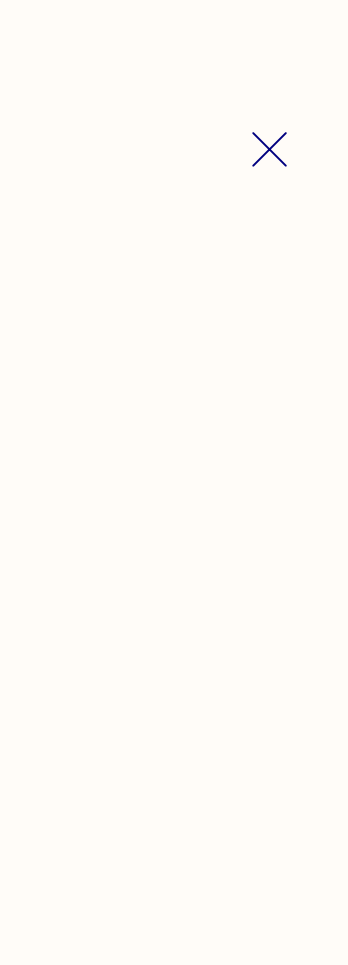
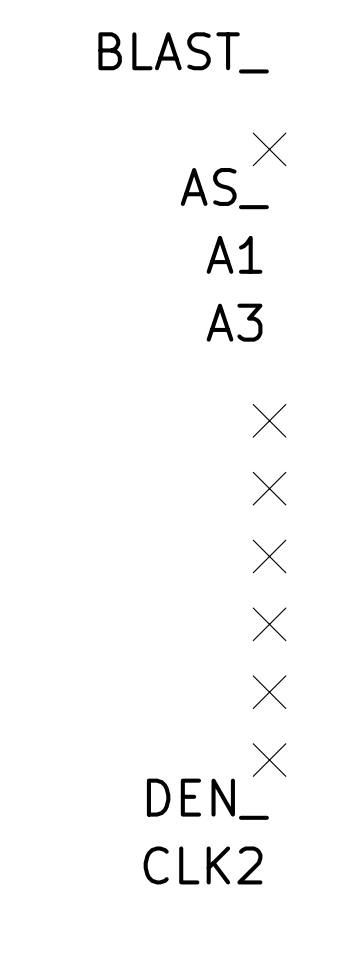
label: none -> BLAST_ (183, 52)
label: none -> AS_ (224, 188)
label: none -> A1 (234, 254)
label: none -> A3 (234, 322)
no-connect mark: none -> (269, 420)
no-connect mark: none -> (269, 488)
no-connect mark: none -> (269, 556)
no-connect mark: none -> (269, 624)
no-connect mark: none -> (269, 692)
no-connect mark: none -> (269, 760)
label: none -> DEN_ (207, 799)
label: none -> CLK2 (203, 865)

